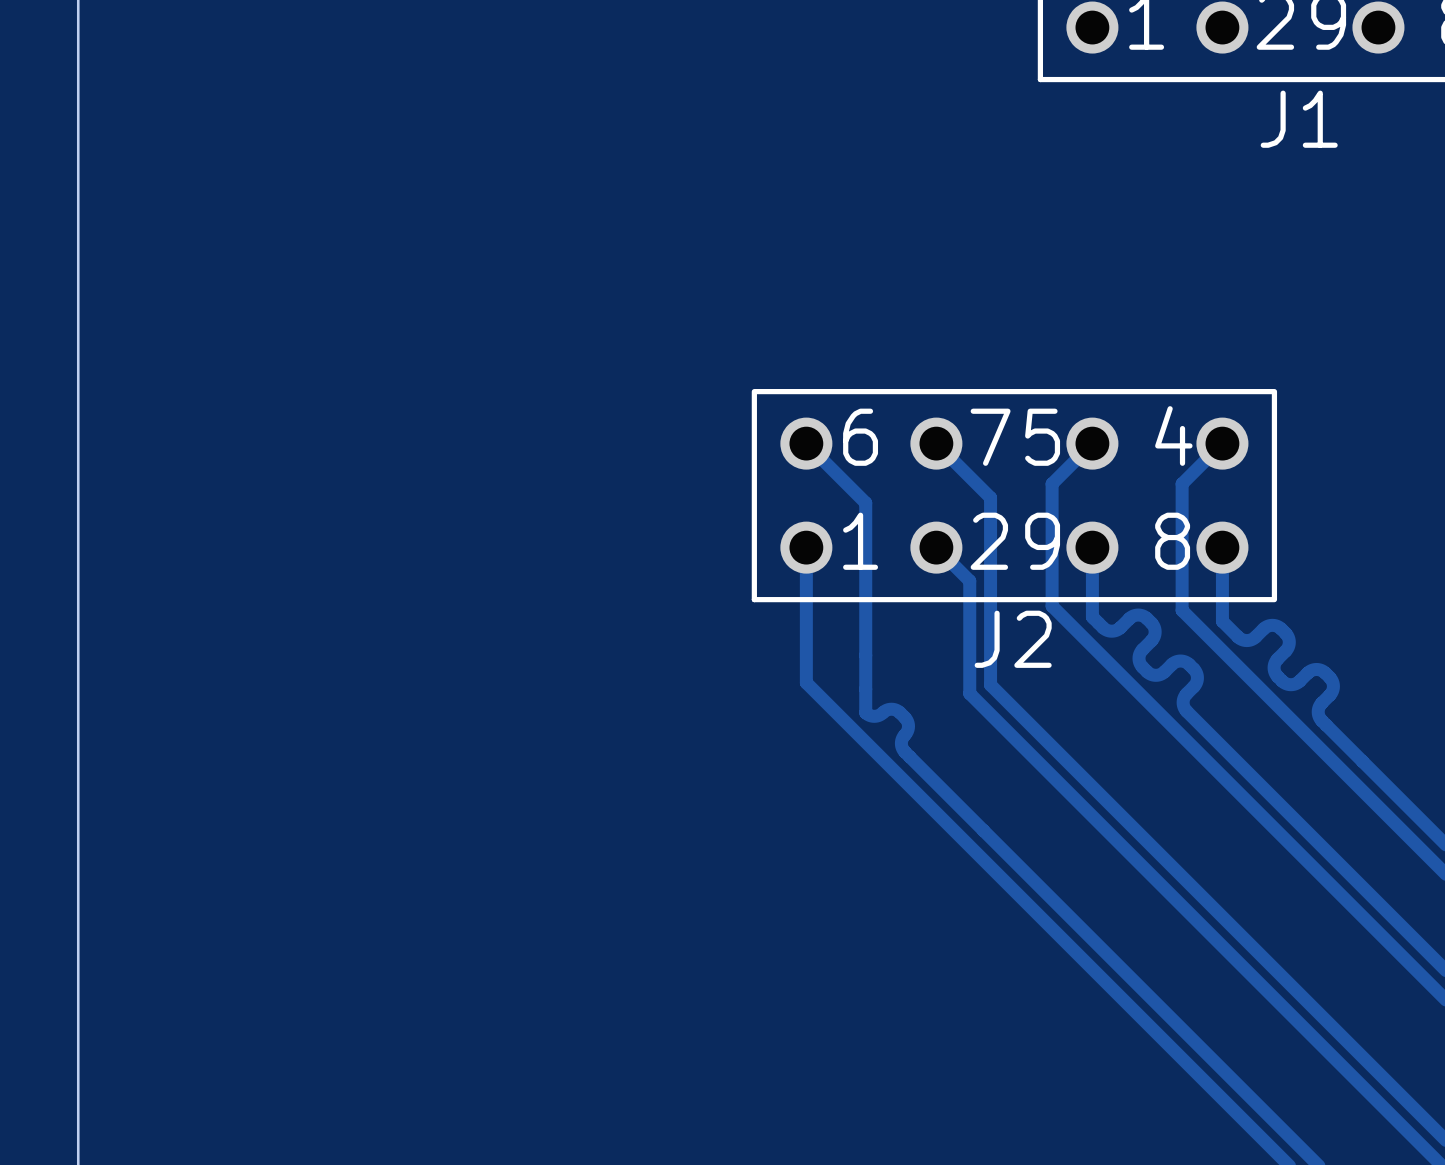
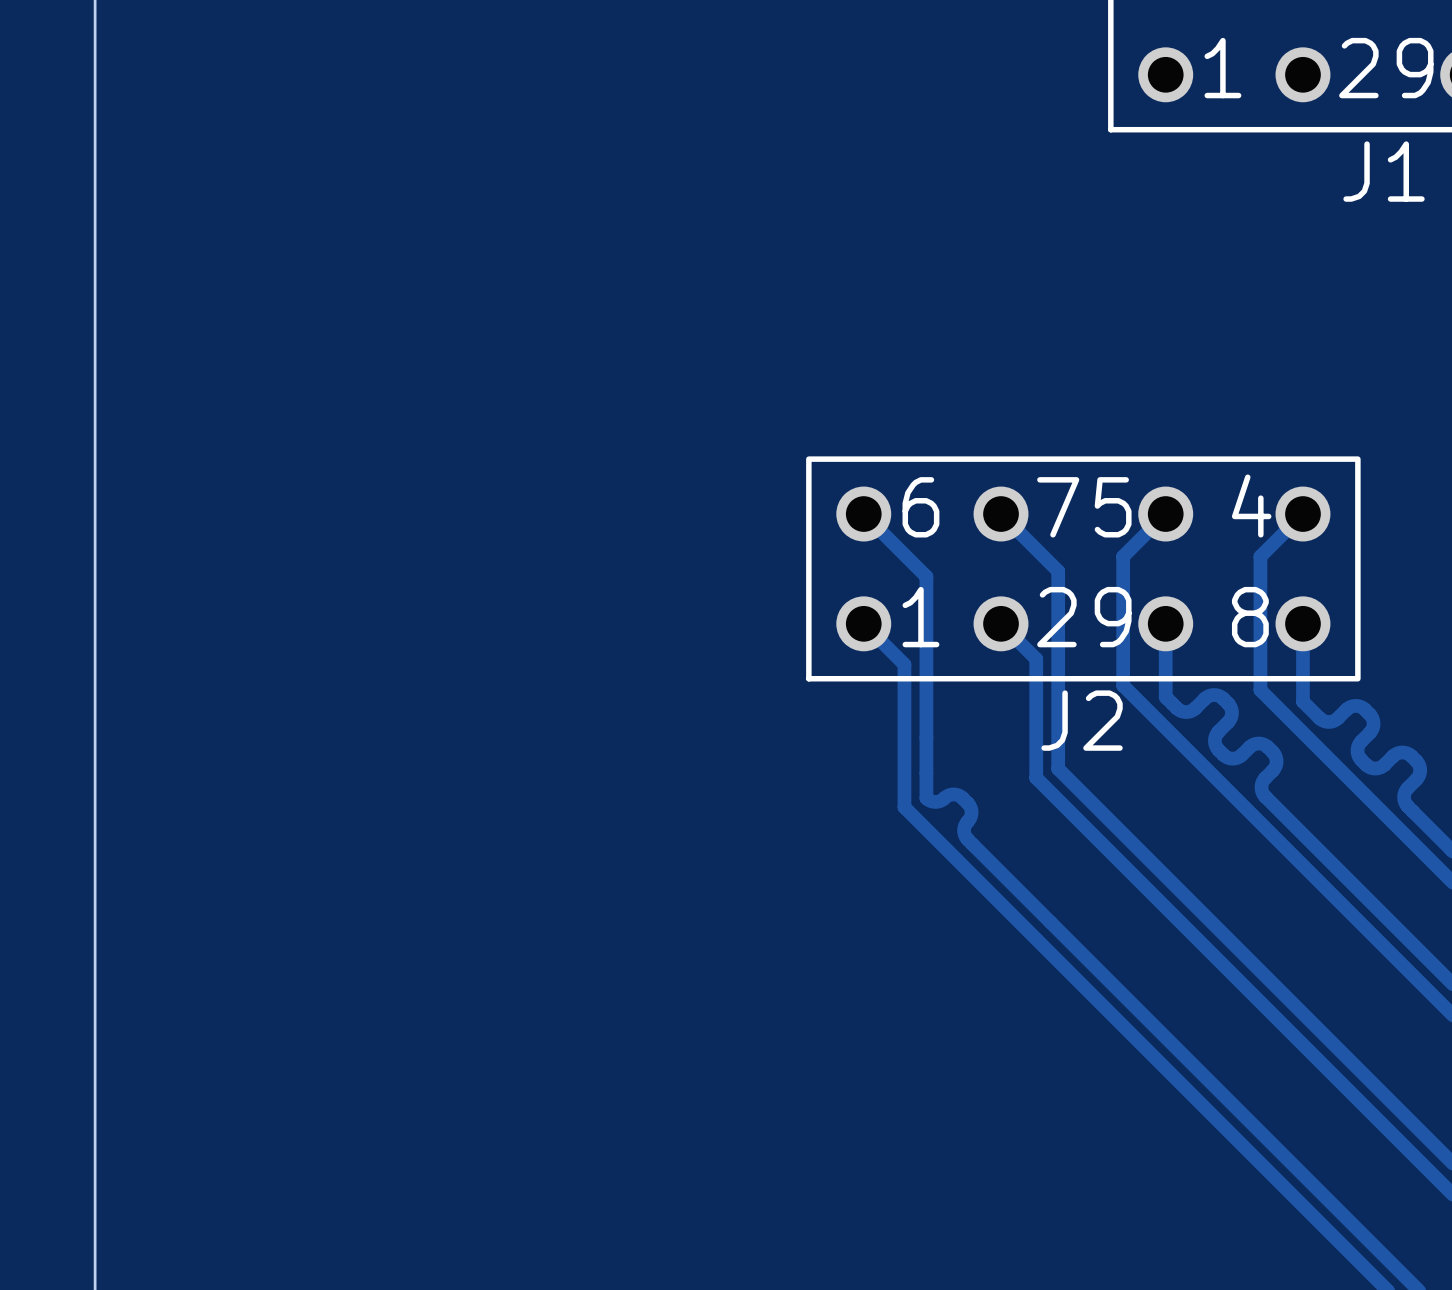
track: (806, 547) (806, 682) (844, 721) -> (863, 623) (904, 664) (904, 807)

